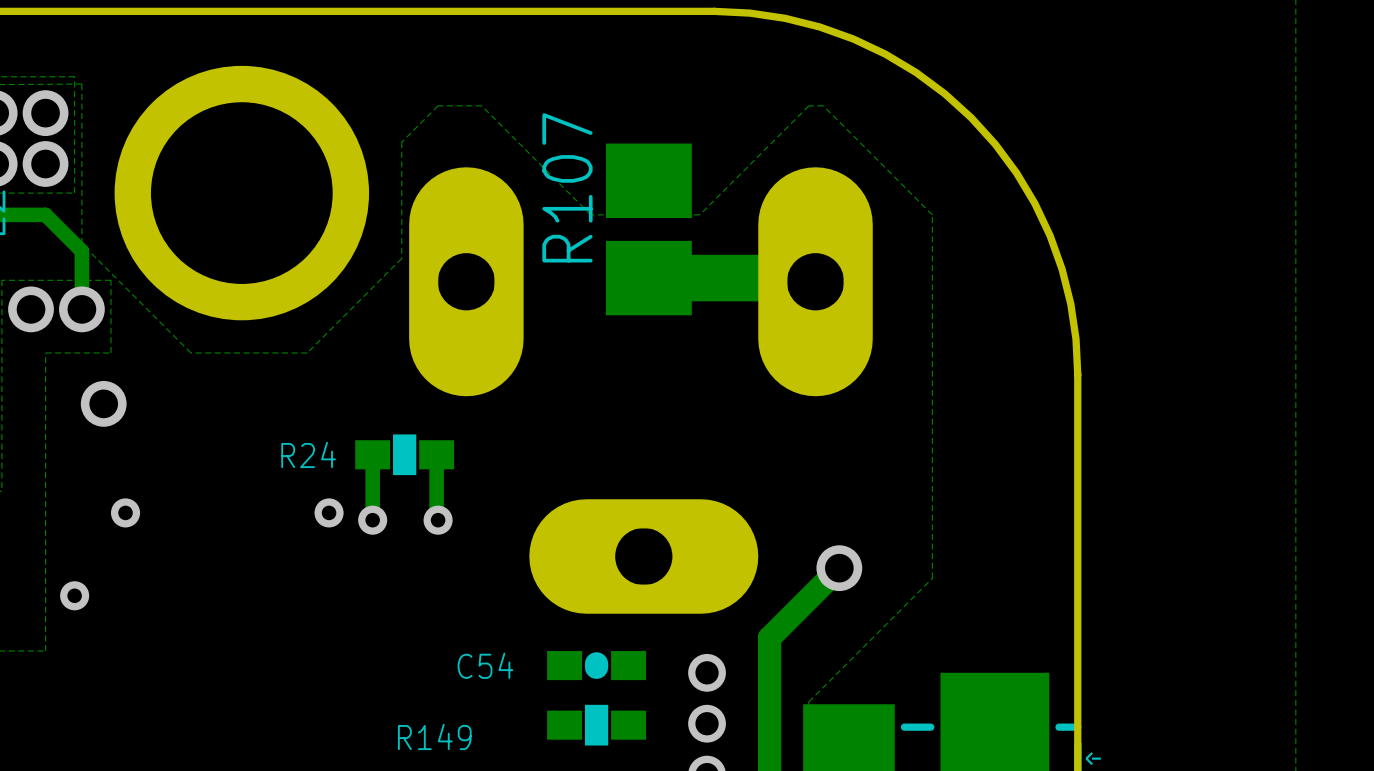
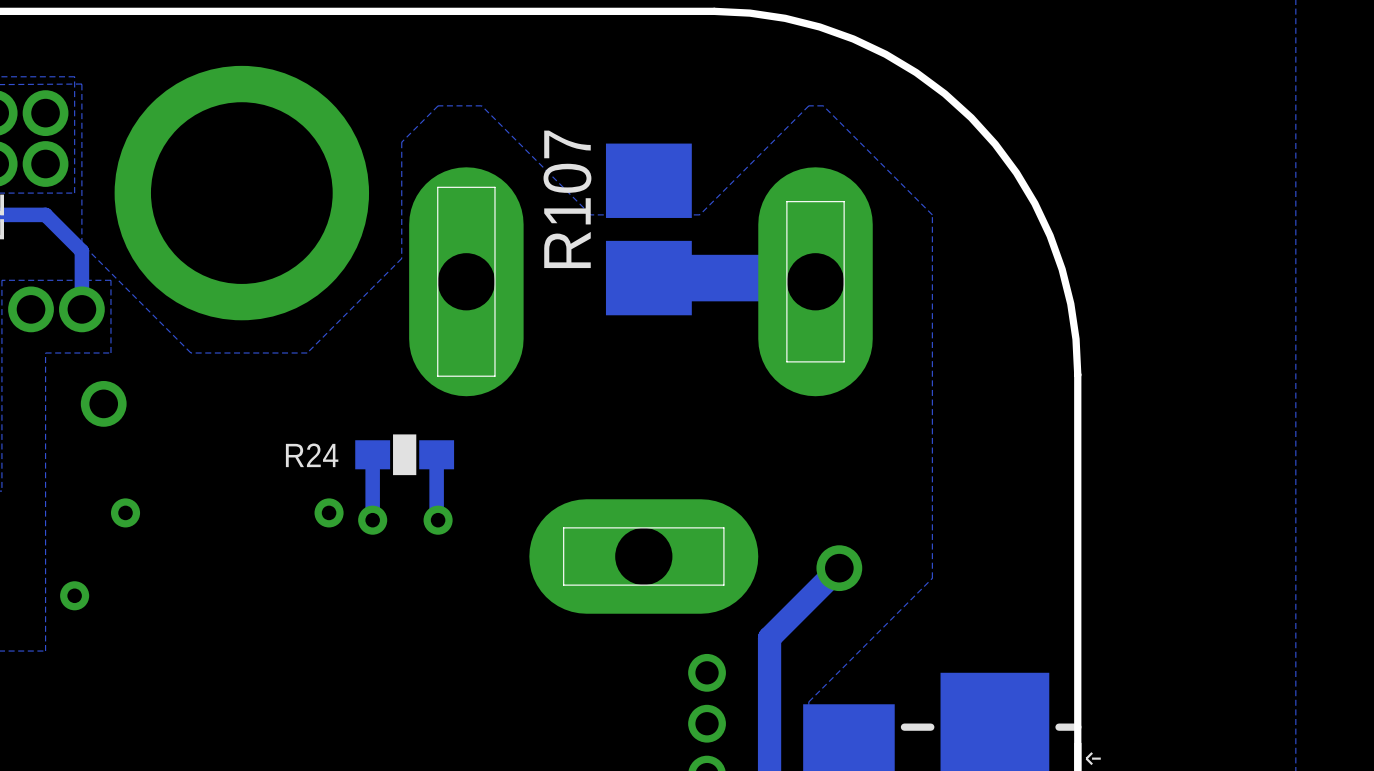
C54: (596, 665) -> none
R149: (596, 725) -> none

